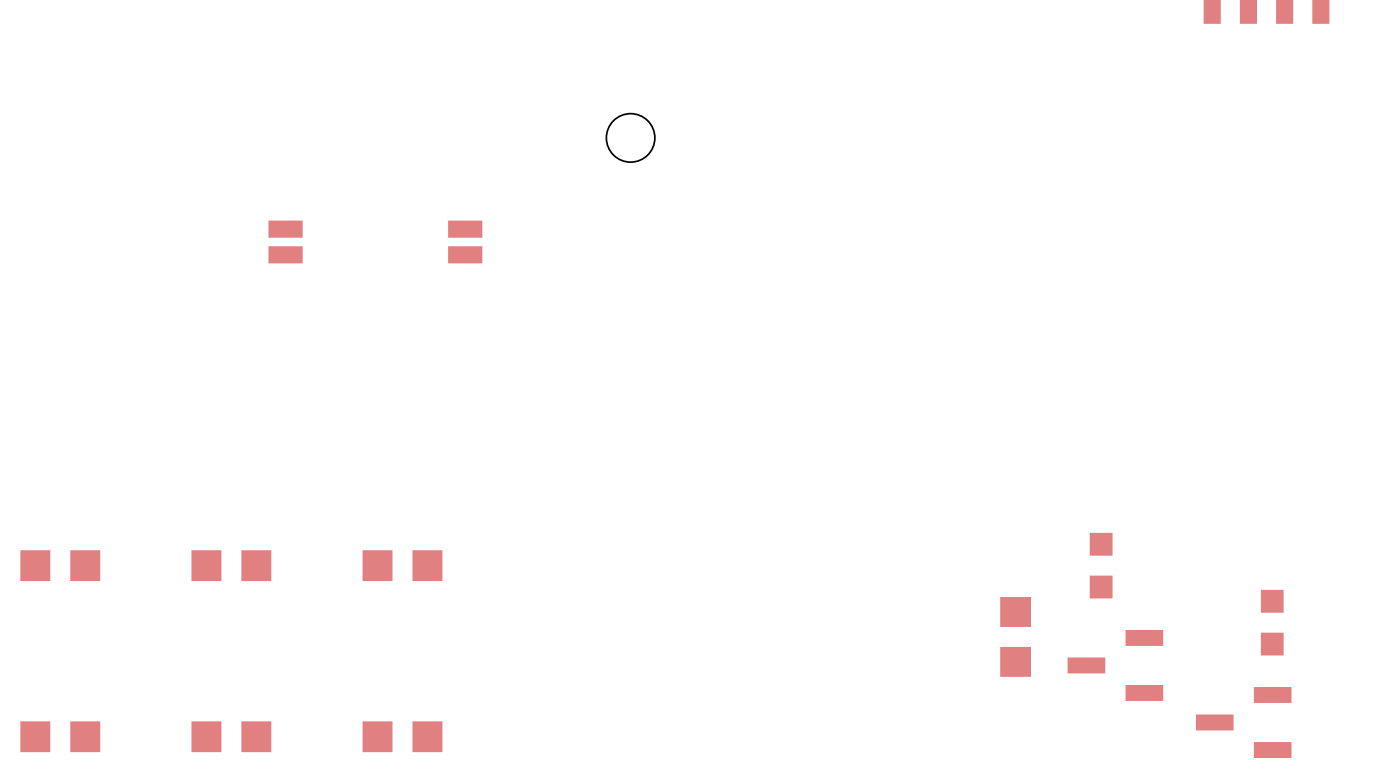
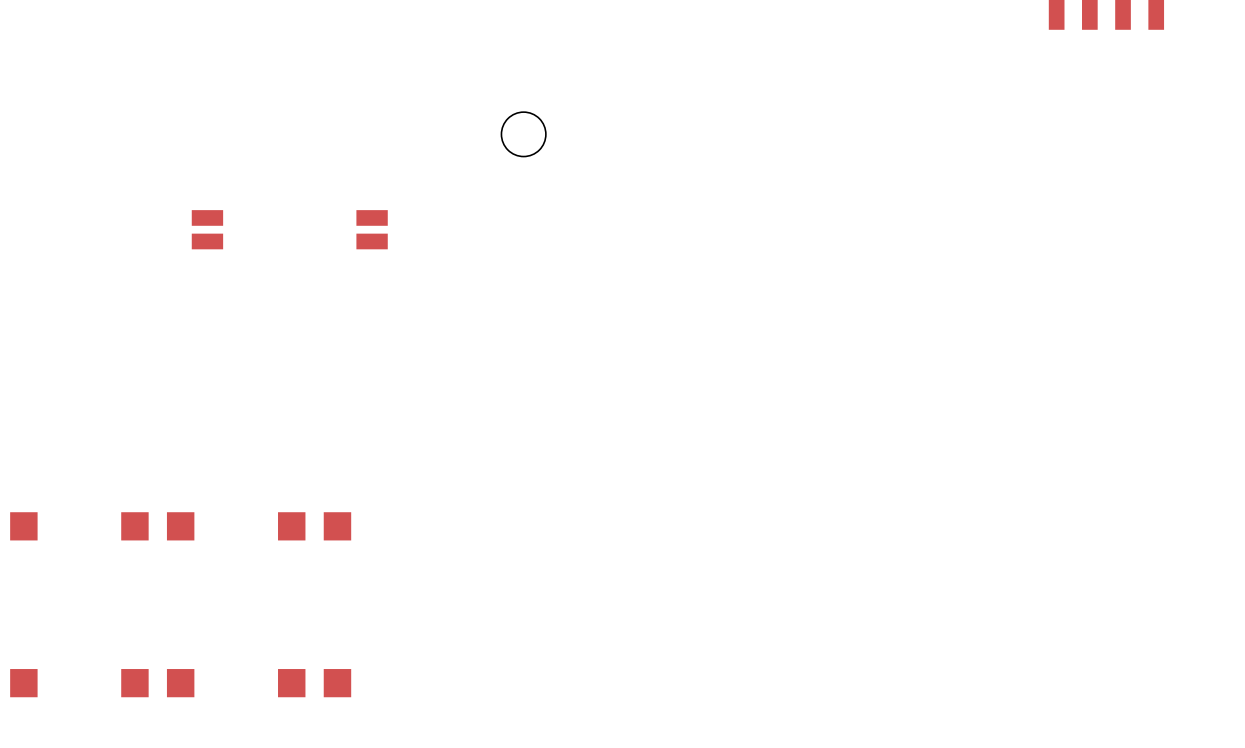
part: (1101, 565) -> none
part: (1272, 622) -> none
part: (1015, 636) -> none
part: (1115, 665) -> none
part: (1243, 722) -> none

